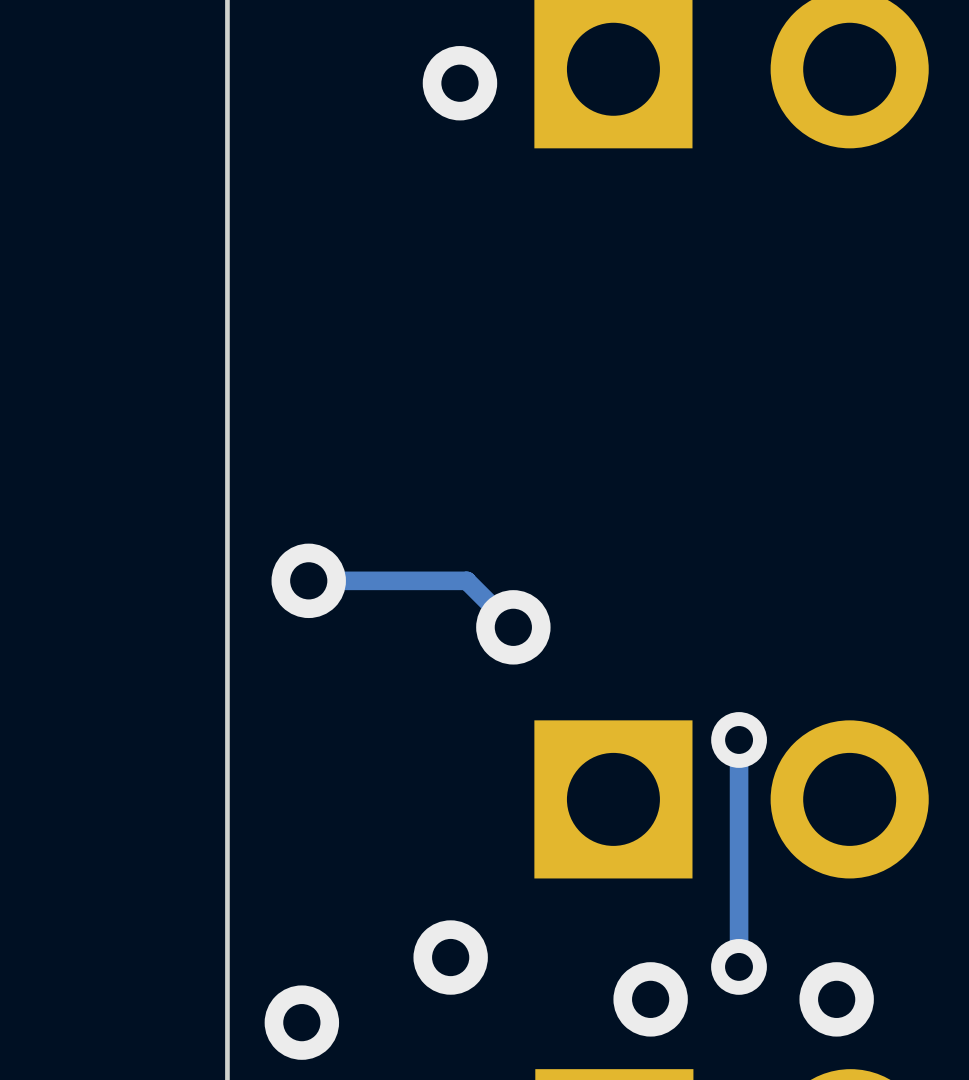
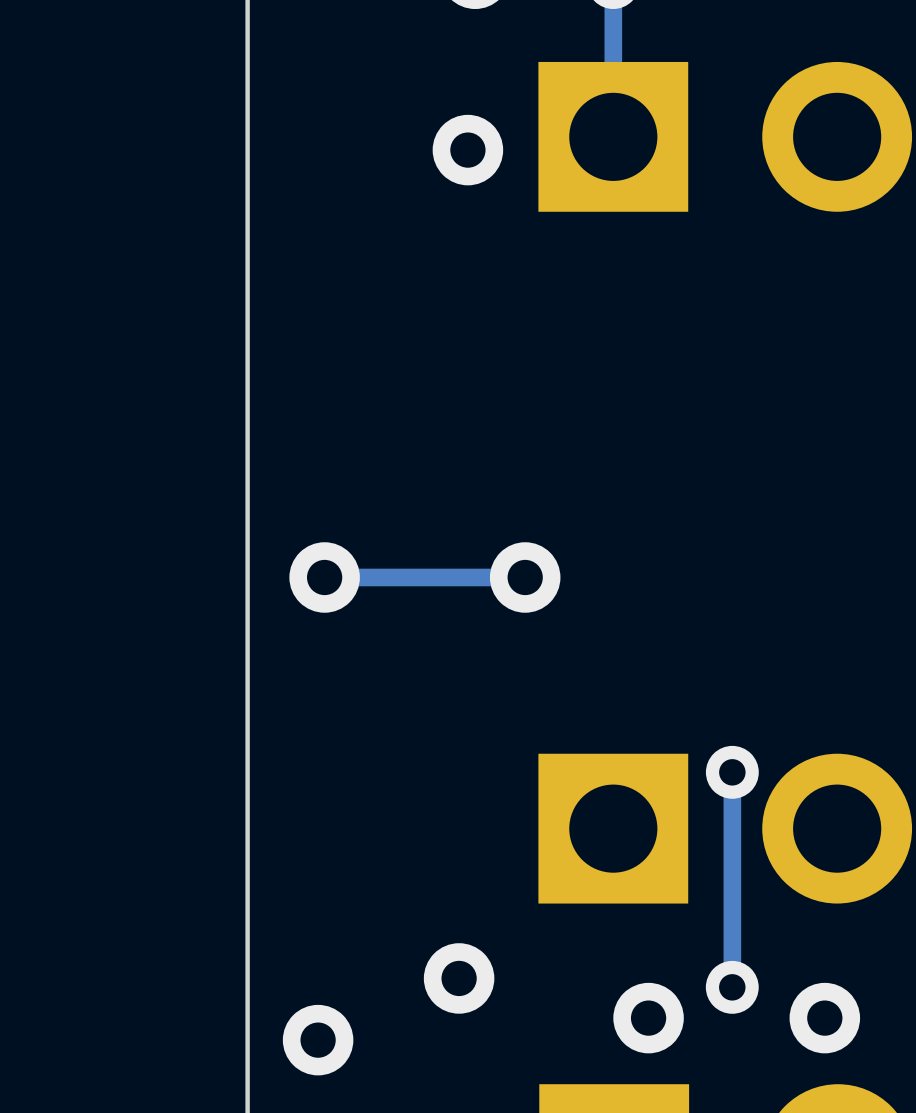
track: none -> (525, 577) (324, 577)
track: (308, 580) (466, 580) (513, 627) -> none
via position: (308, 580) -> (324, 577)
via position: (513, 627) -> (525, 577)

